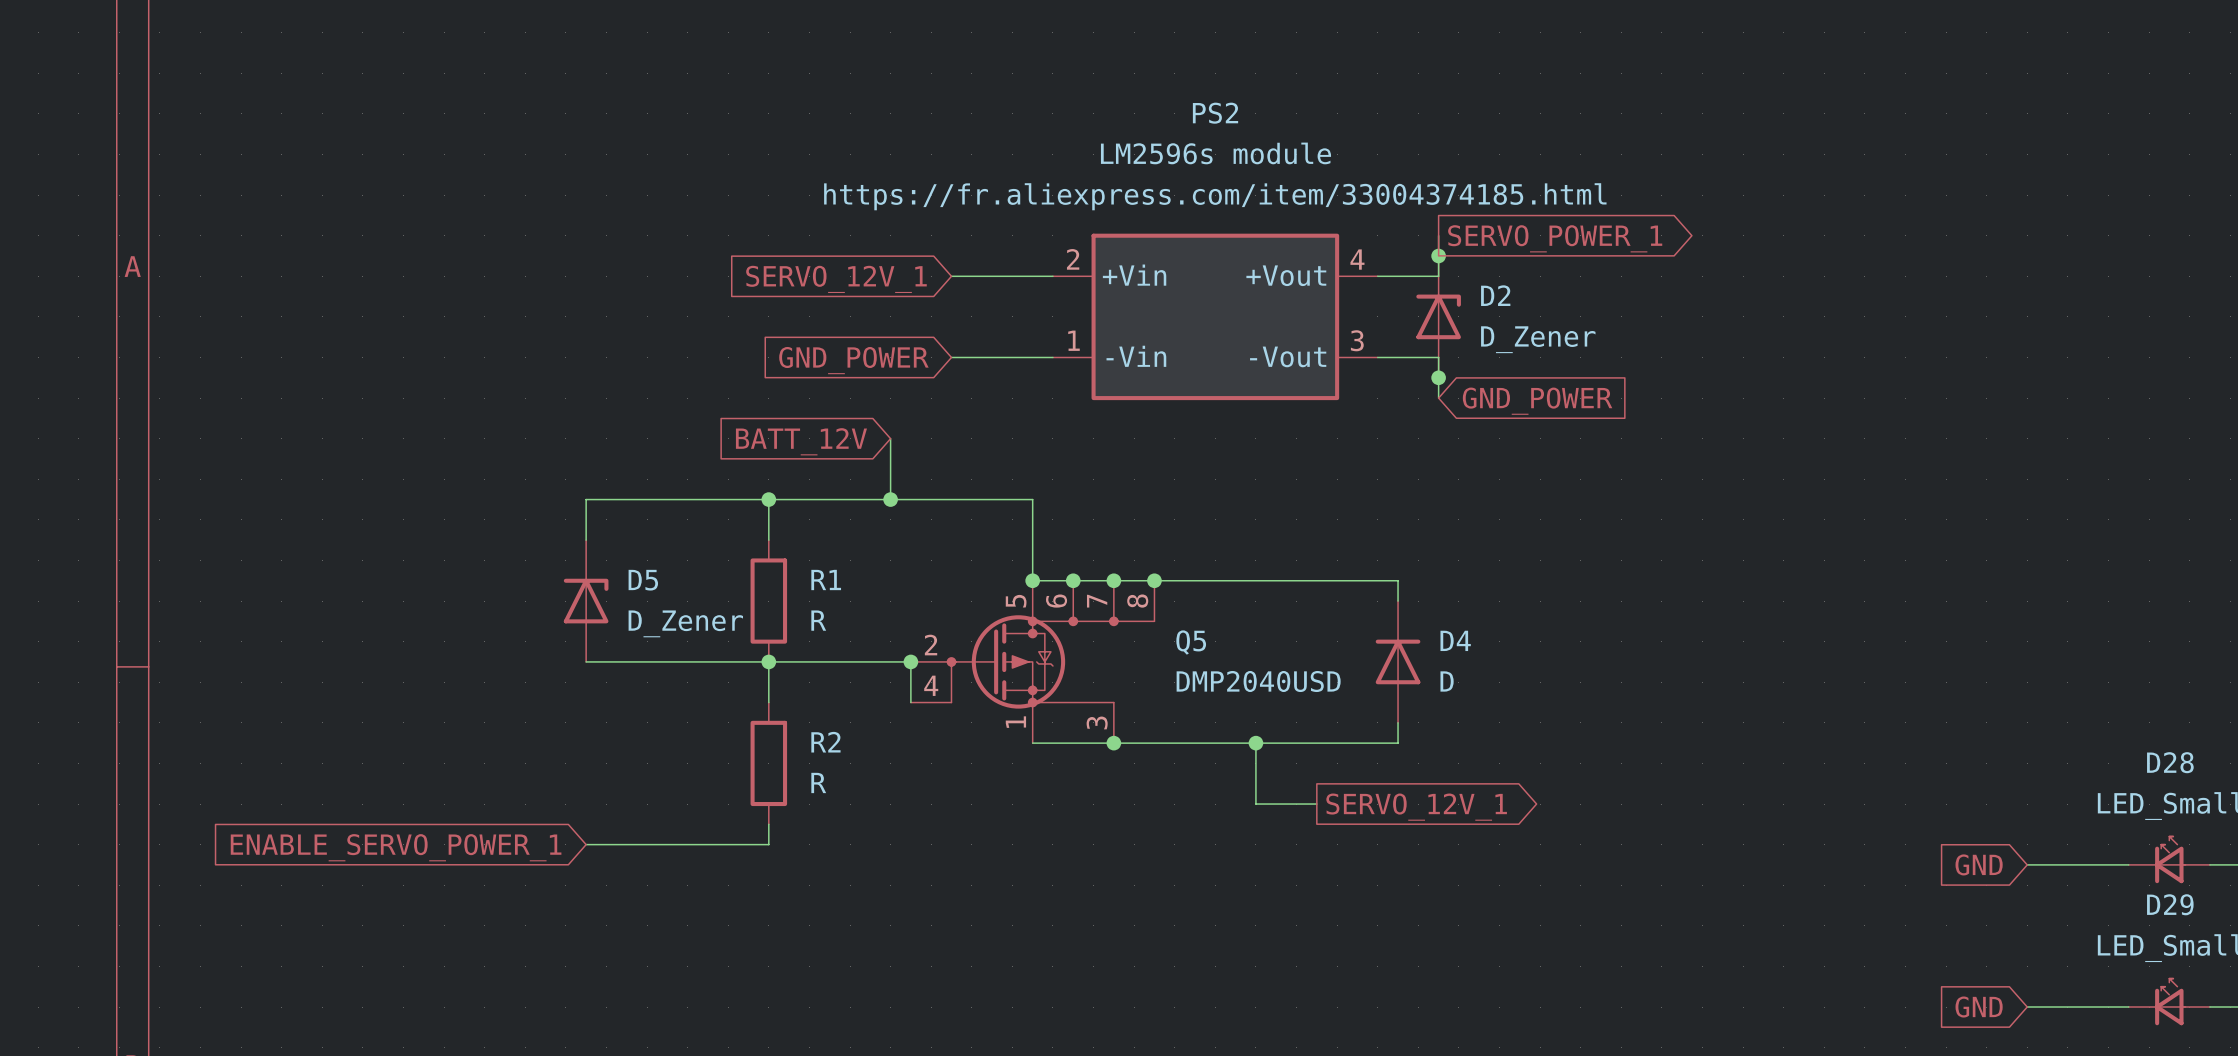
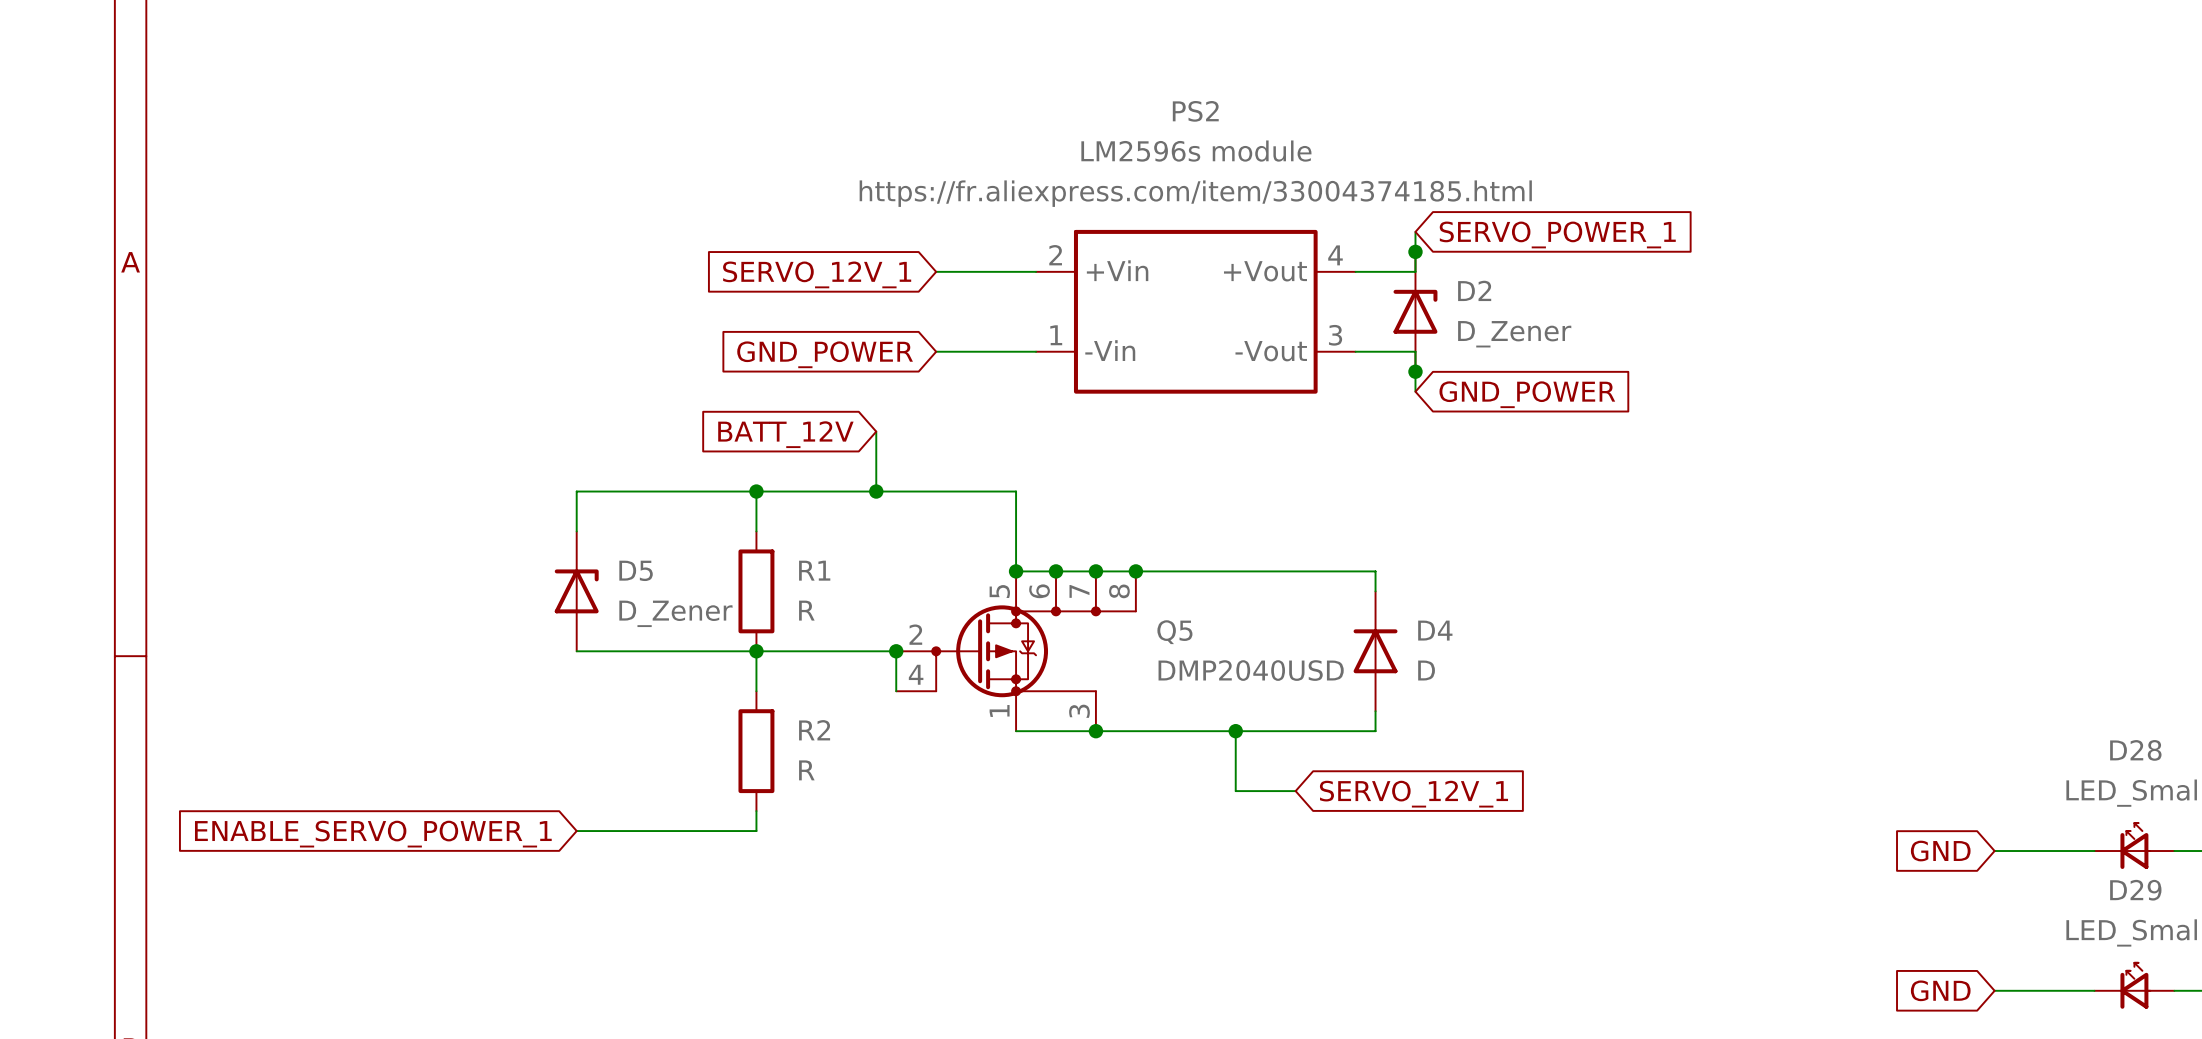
global label shape: output (1555, 238) -> input (1557, 234)
global label shape: output (1416, 807) -> input (1413, 794)

